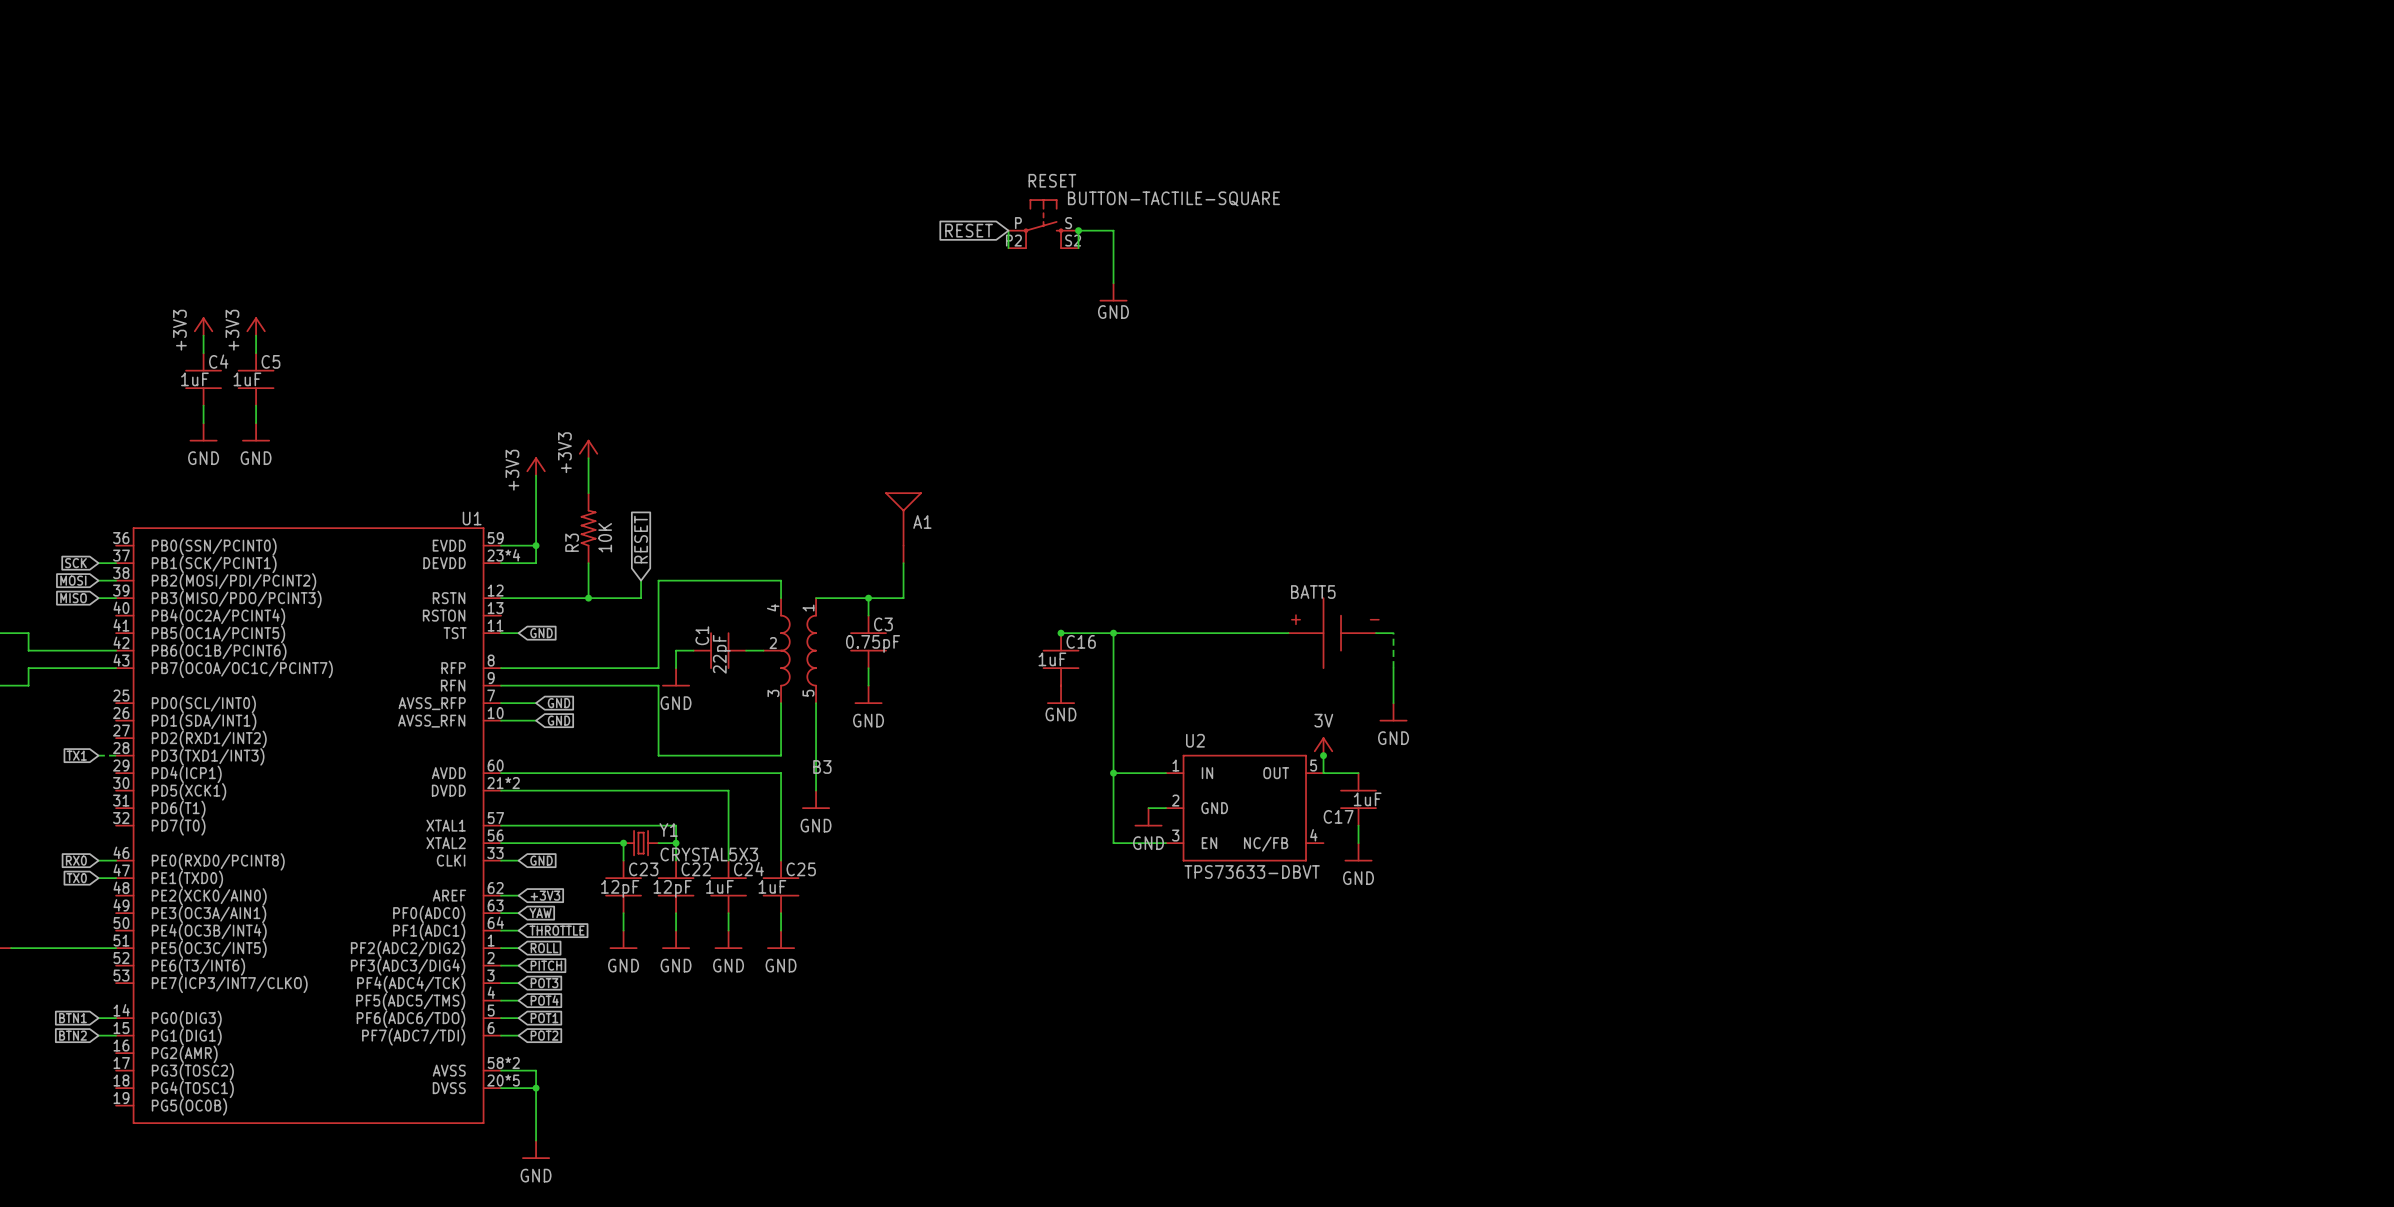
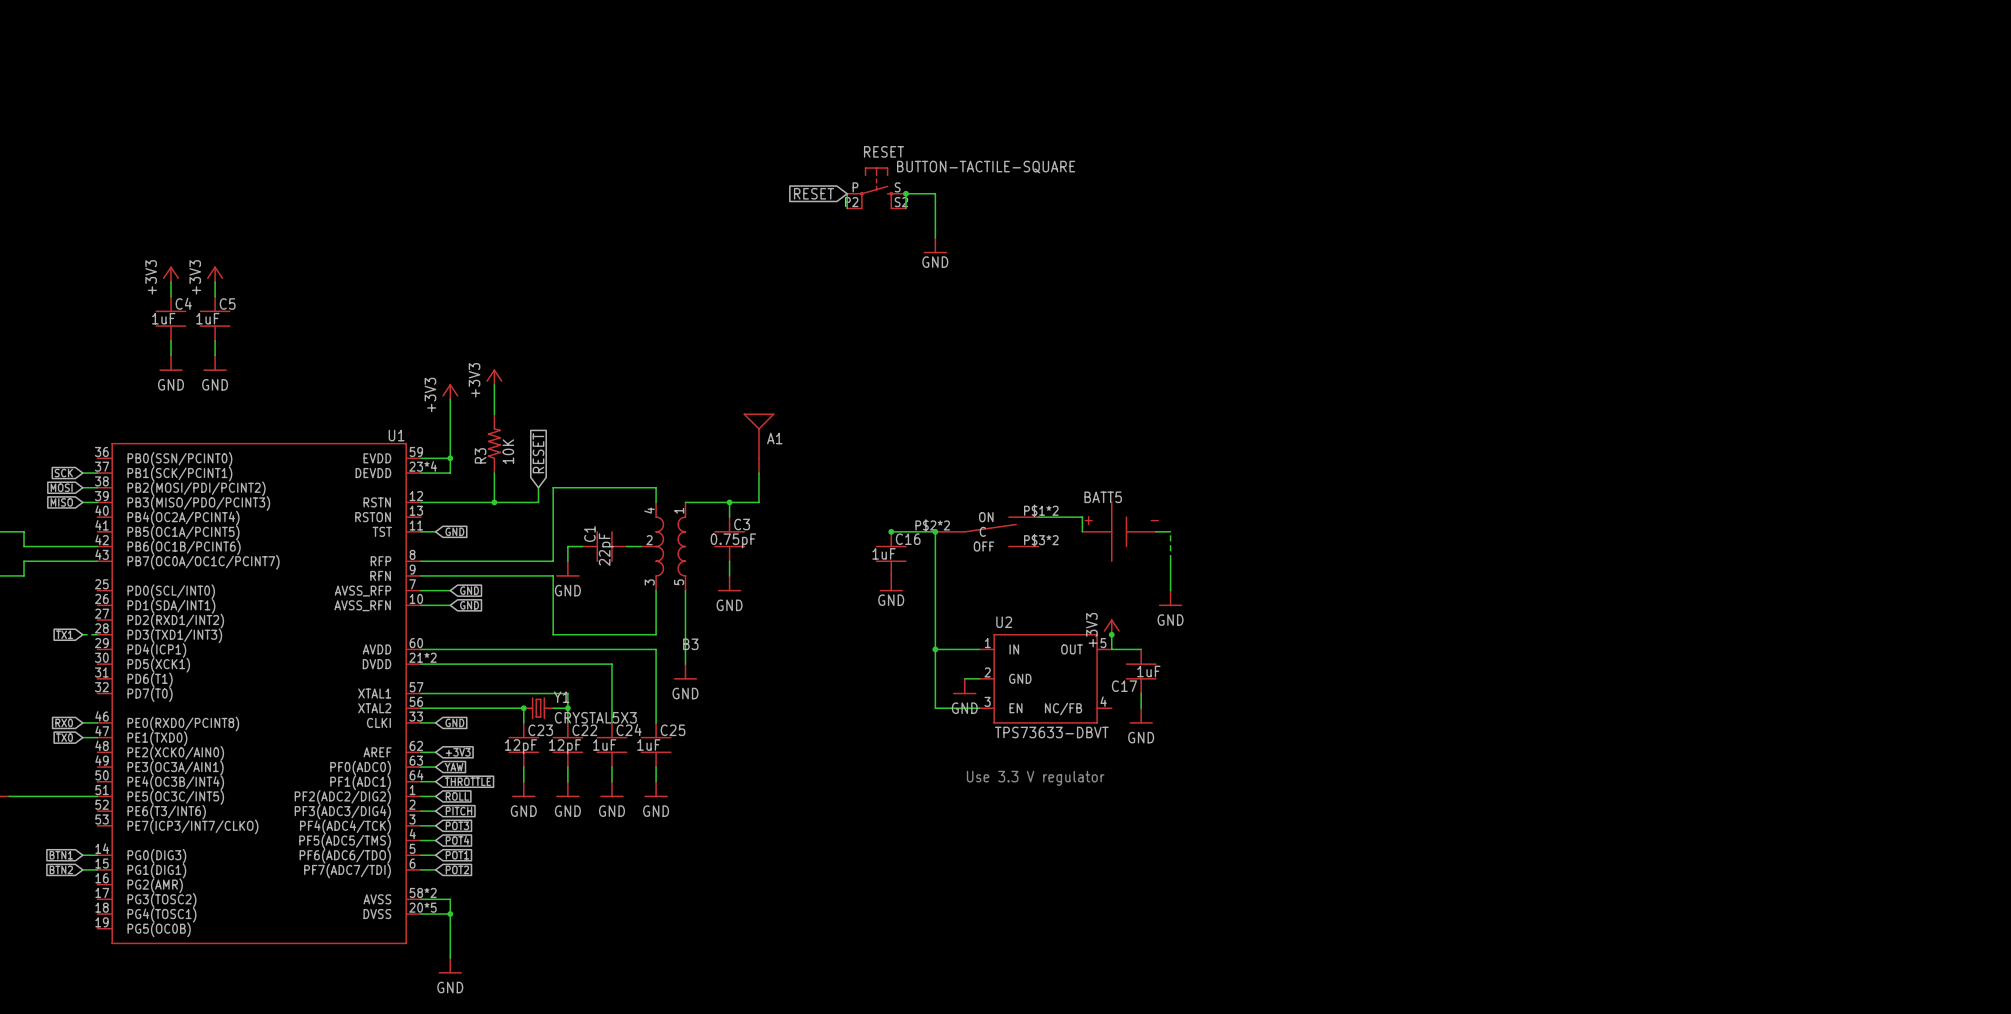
wire: (1113, 633) (1288, 633) -> (1038, 517) (1082, 517) (1082, 531)
part: none -> (986, 531)
power symbol: 3V (1323, 746) -> +3V3 (1111, 627)
text: none -> Use 3.3 V regulator (1035, 778)

